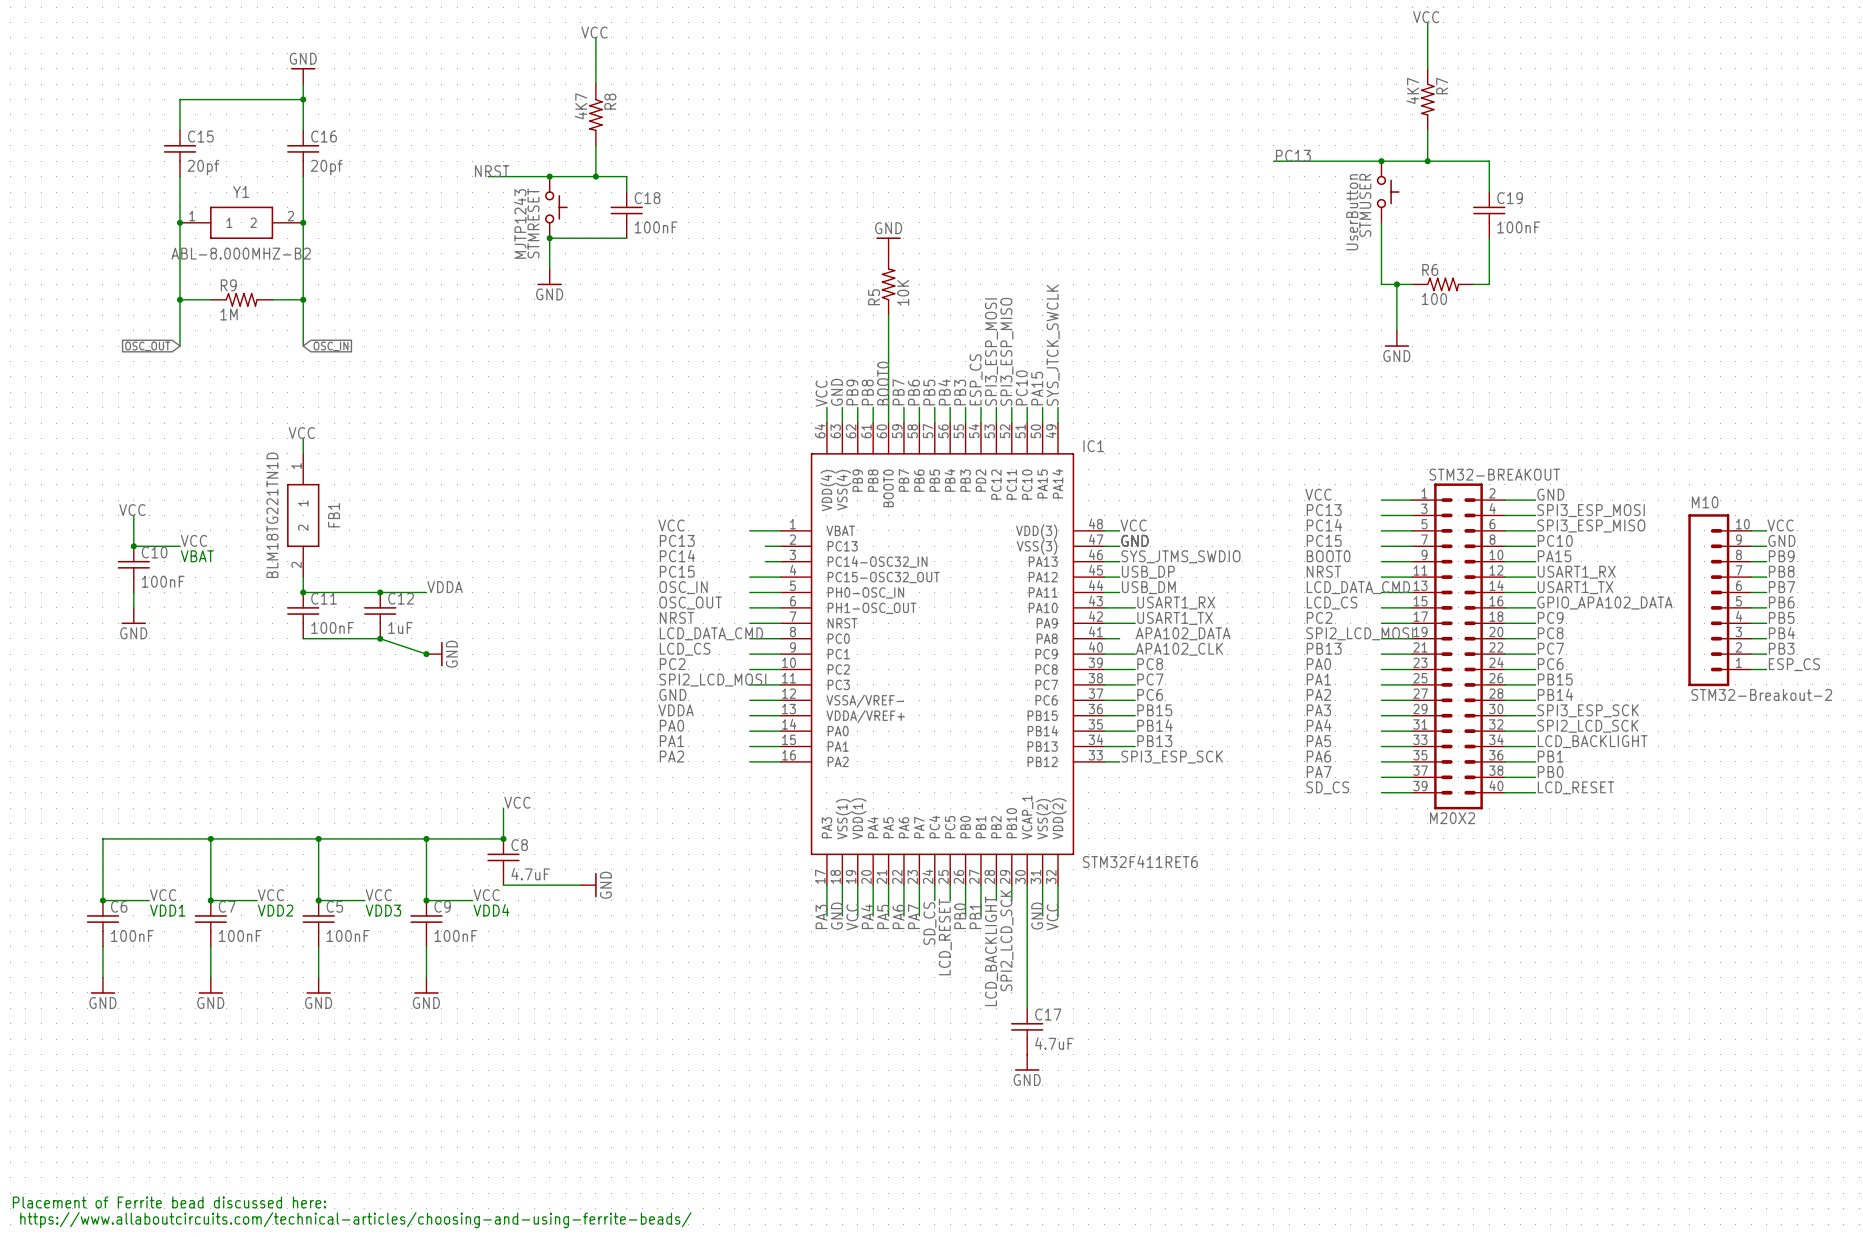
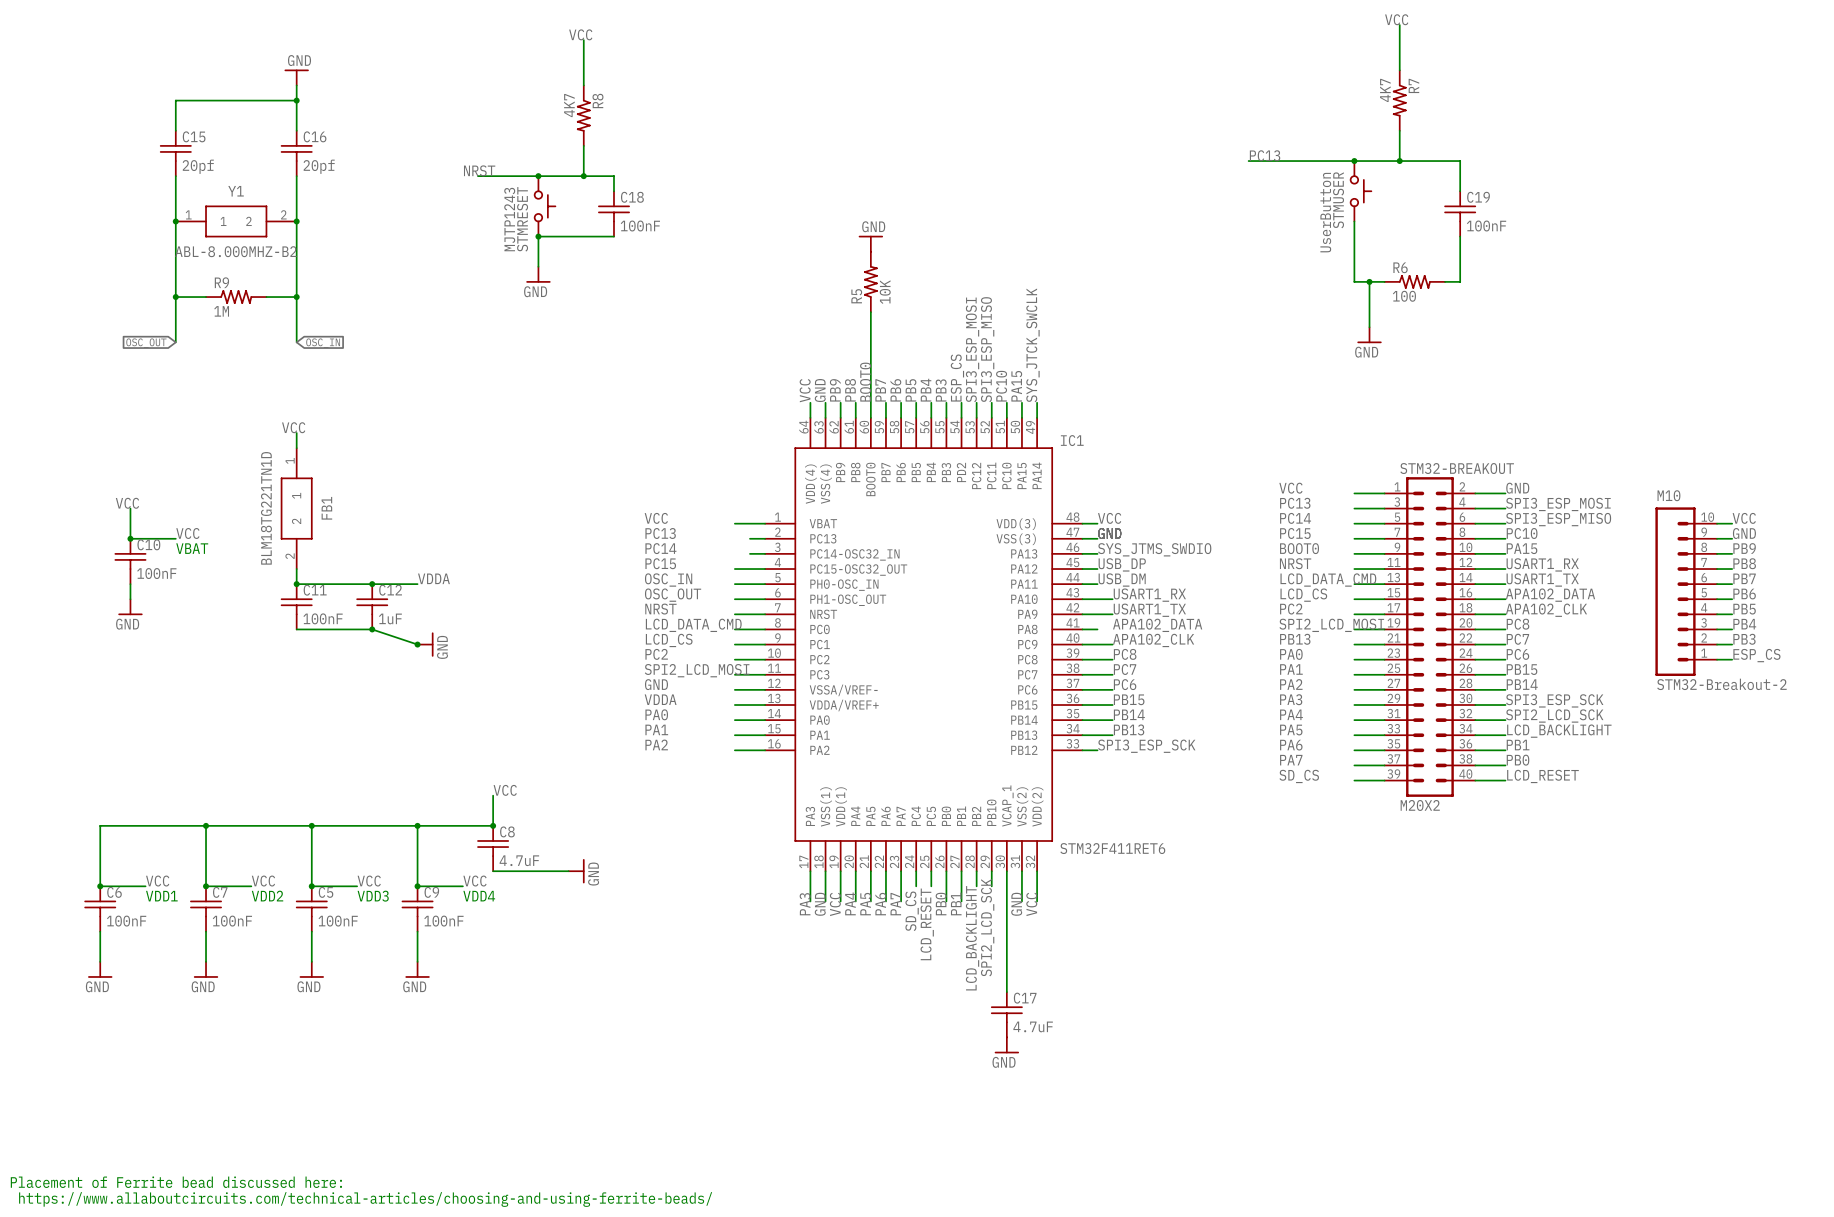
label: GPIO_APA102_DATA (1604, 603) -> APA102_DATA (1550, 595)
label: PC9 (1550, 617) -> APA102_CLK (1546, 610)

